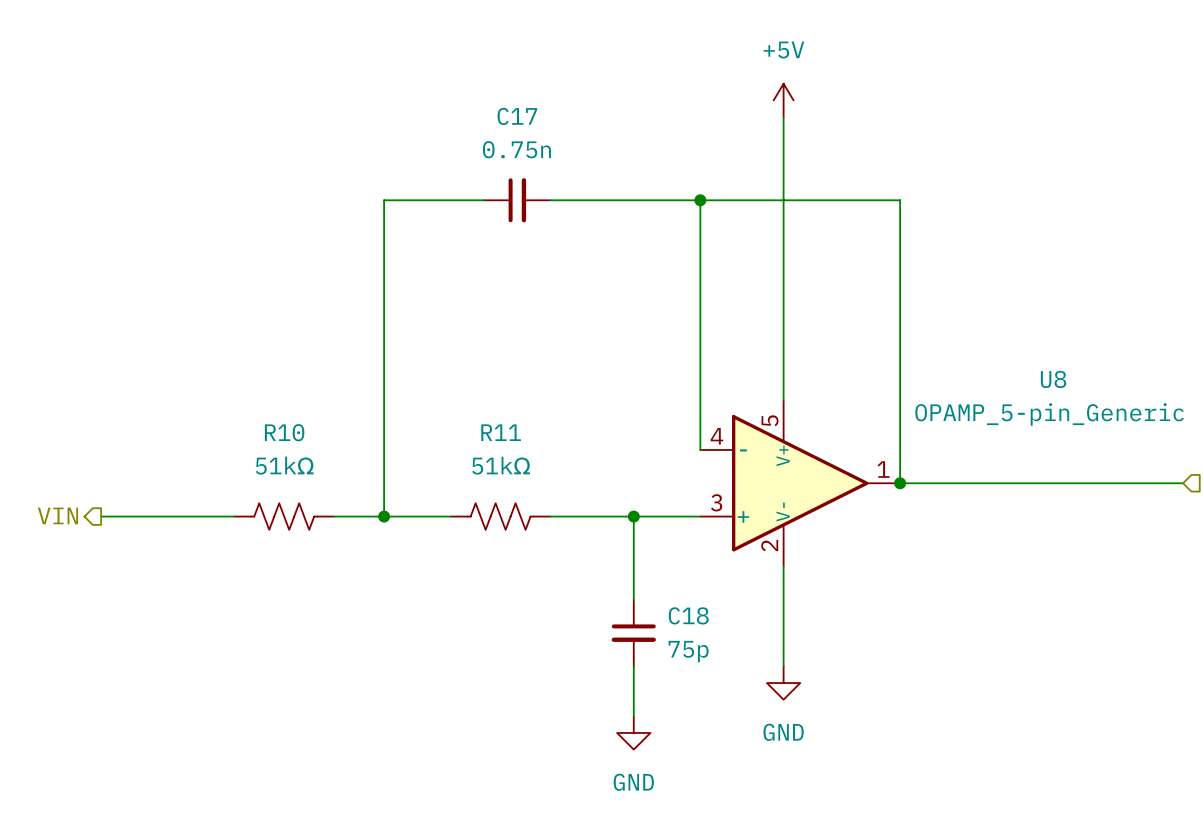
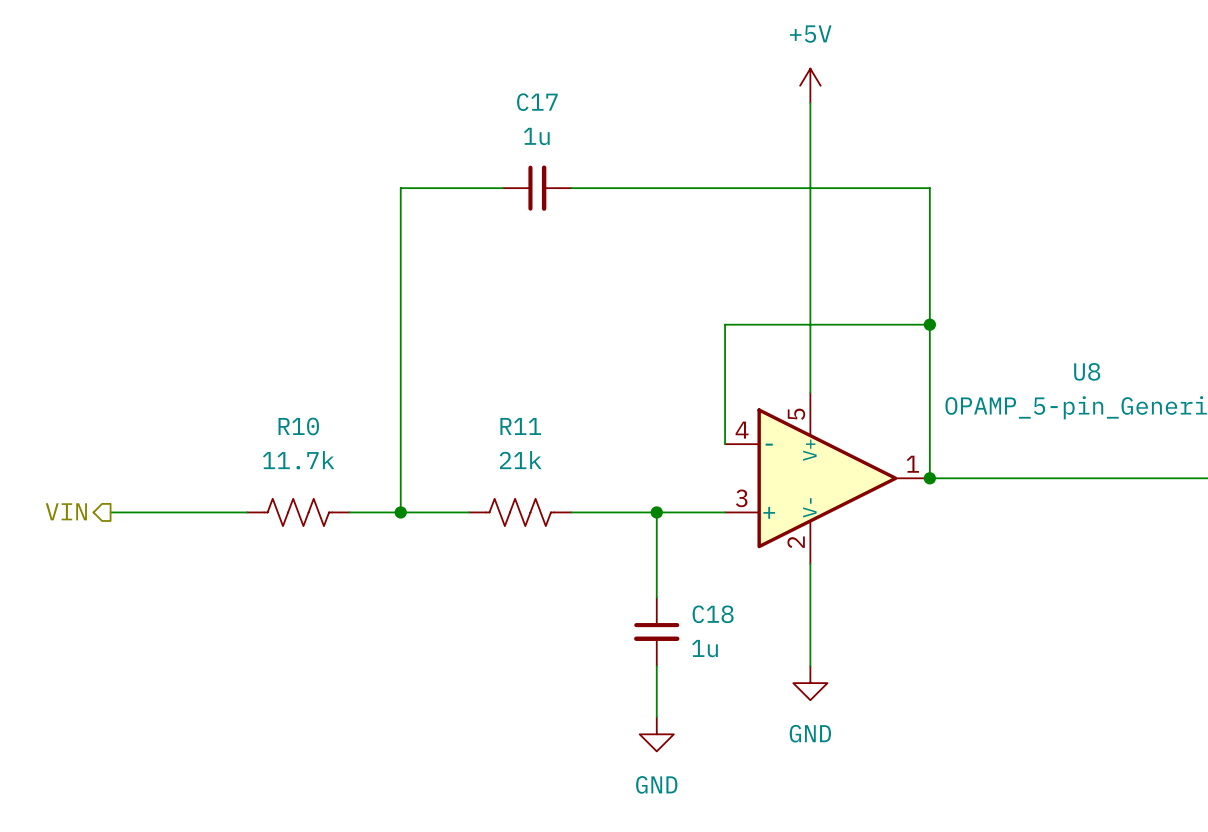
C17 value: 0.75n (516, 149) -> 1u (536, 136)
wire: (700, 200) (700, 333) -> (929, 324) (725, 324)
junction: (700, 200) -> none
junction: none -> (929, 324)
R10 value: 51kΩ (284, 465) -> 11.7k (298, 460)
R11 value: 51kΩ (501, 465) -> 21k (520, 460)
C18 value: 75p (688, 651) -> 1u (705, 648)

